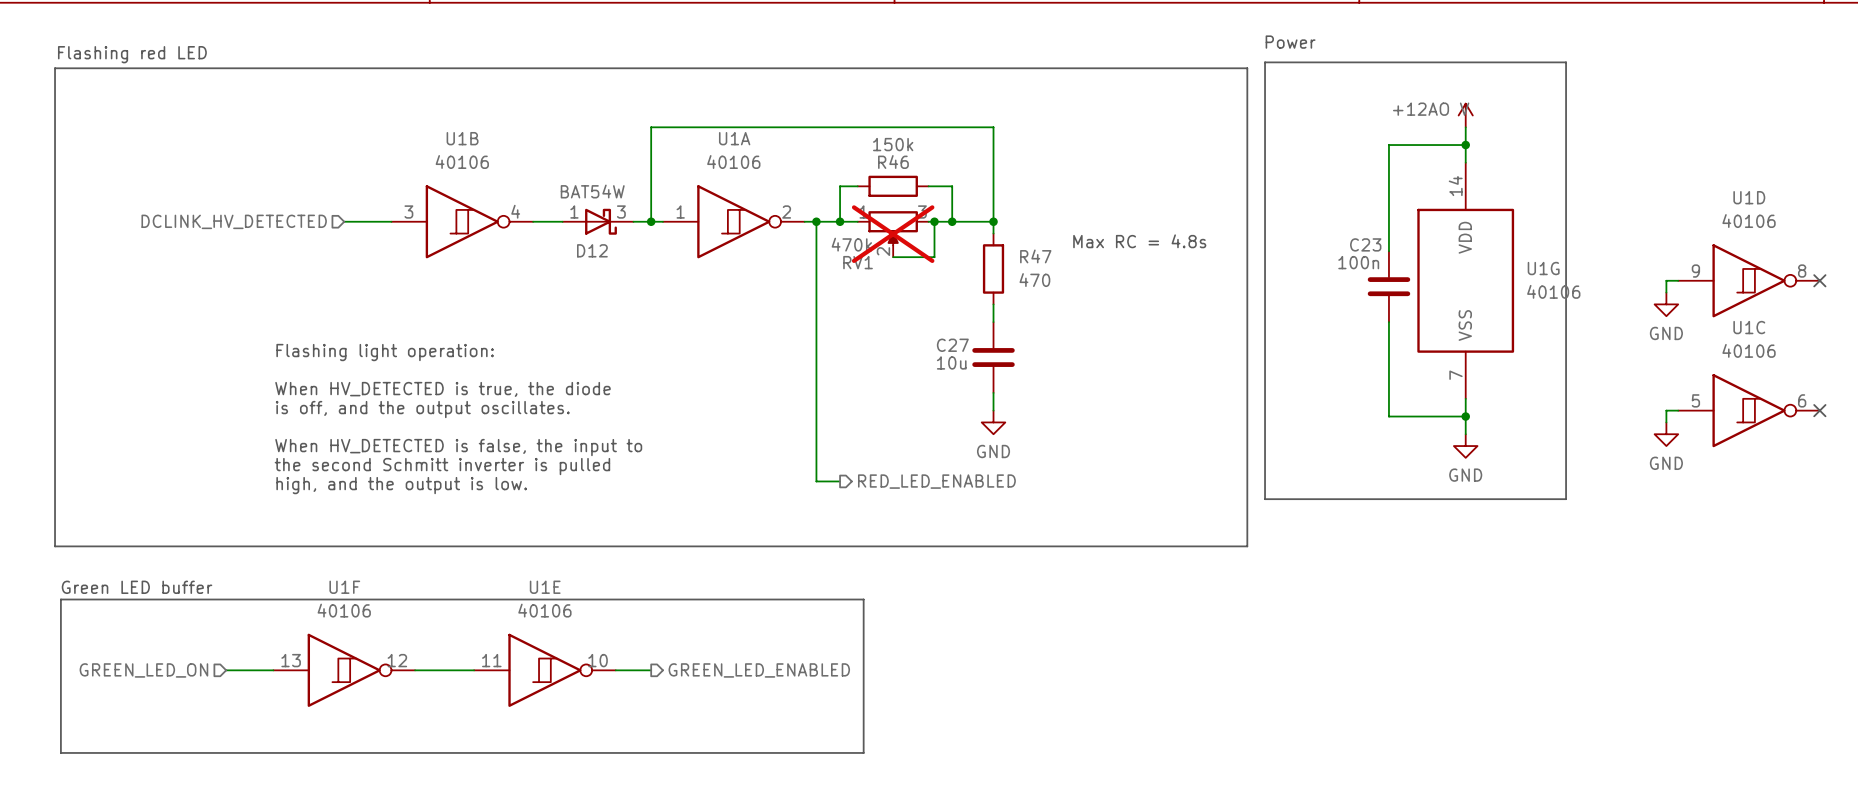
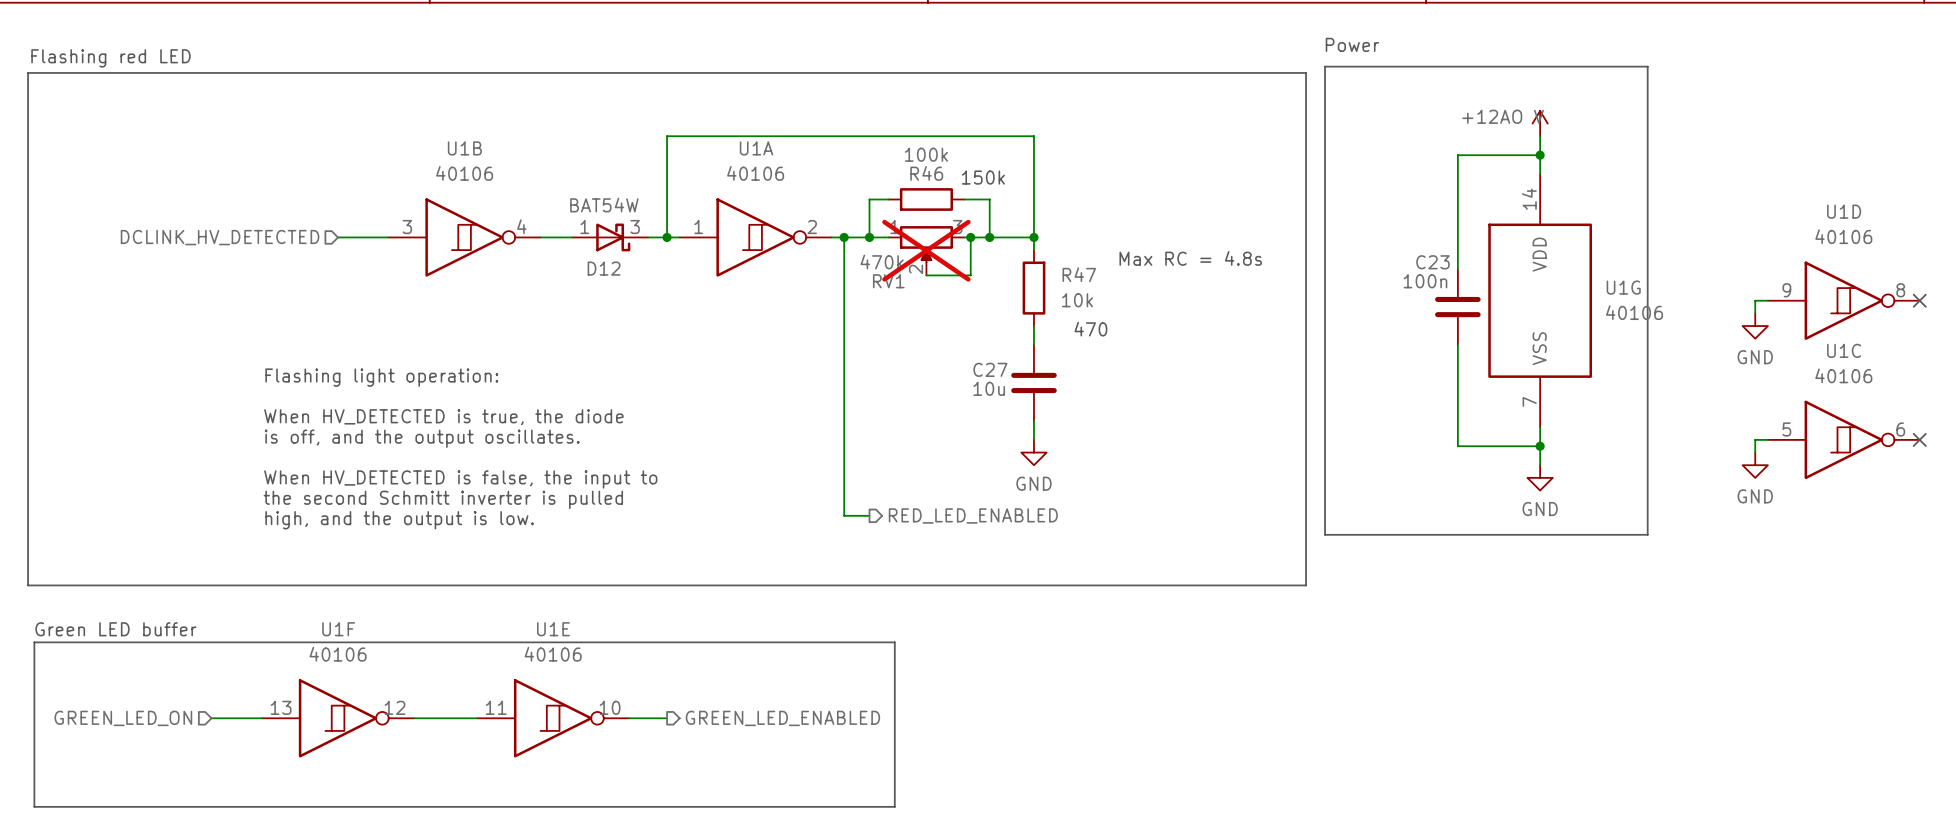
R46 value: 150k (893, 144) -> 100k (926, 154)
text: none -> 150k (983, 177)
R47 value: 470 (1034, 280) -> 10k (1077, 300)
text: none -> 470 (1090, 329)

